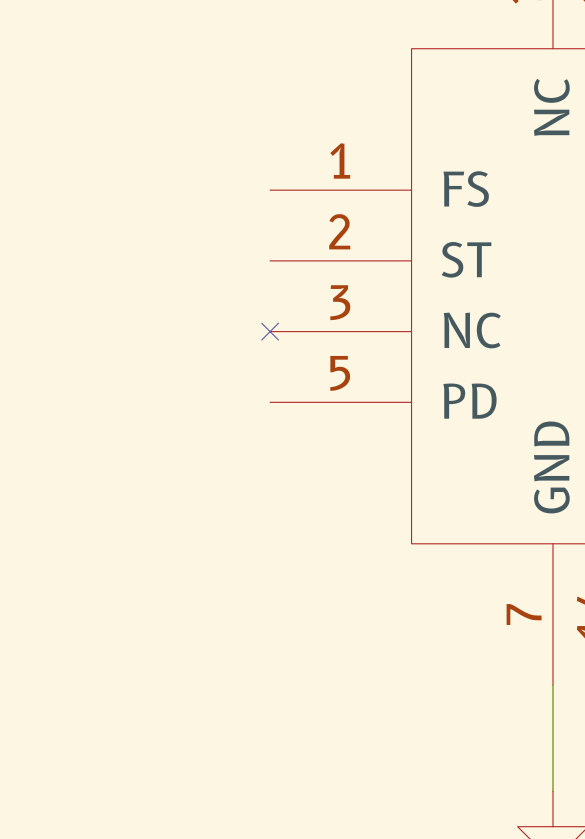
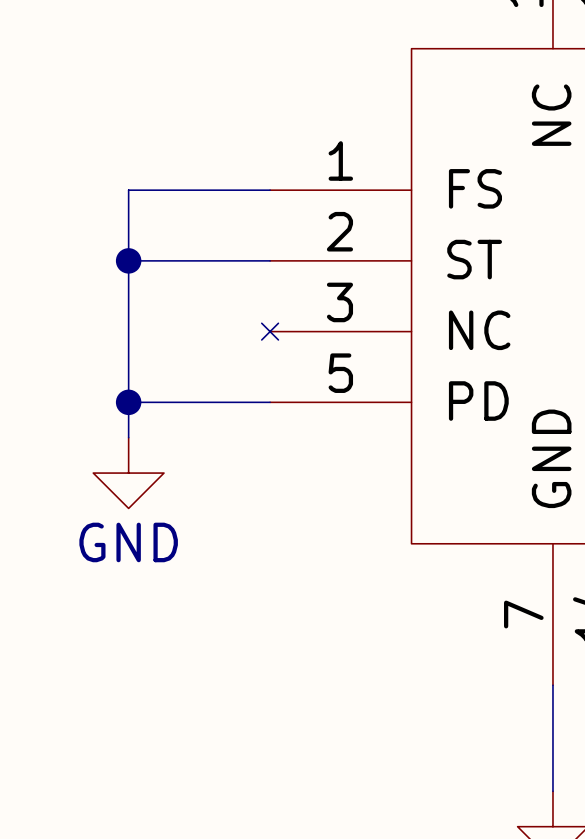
wire: none -> (270, 190) (128, 190) (128, 437)
wire: none -> (128, 260) (270, 260)
junction: none -> (128, 260)
wire: none -> (128, 402) (270, 402)
junction: none -> (128, 402)
power symbol: none -> GND (128, 473)

